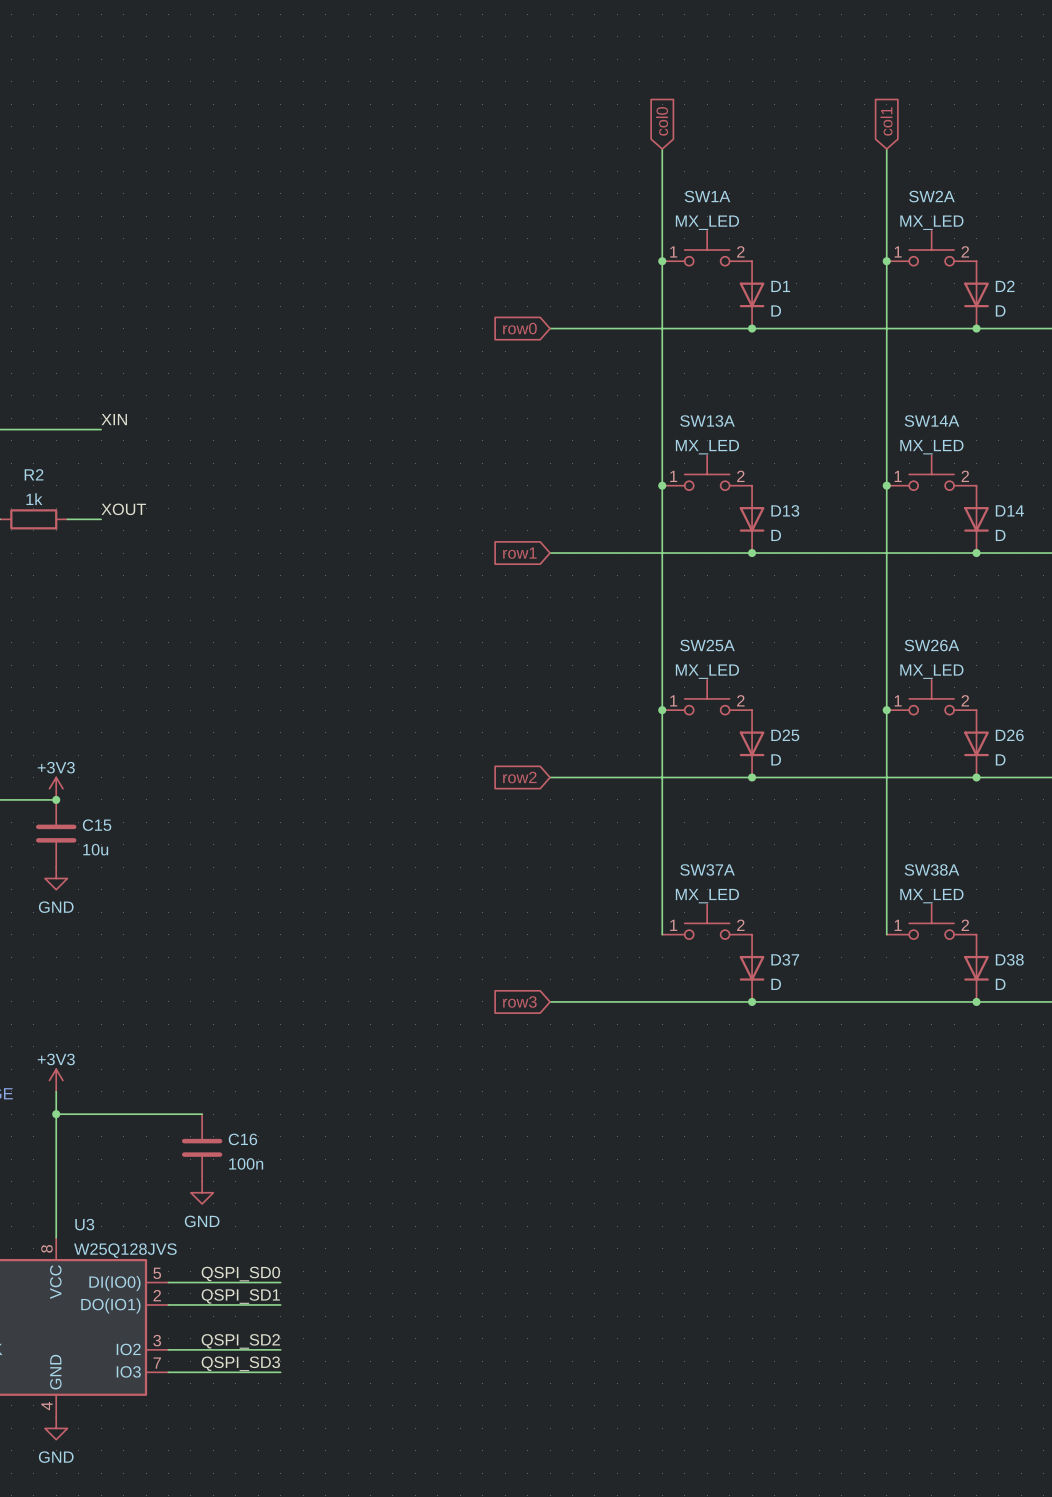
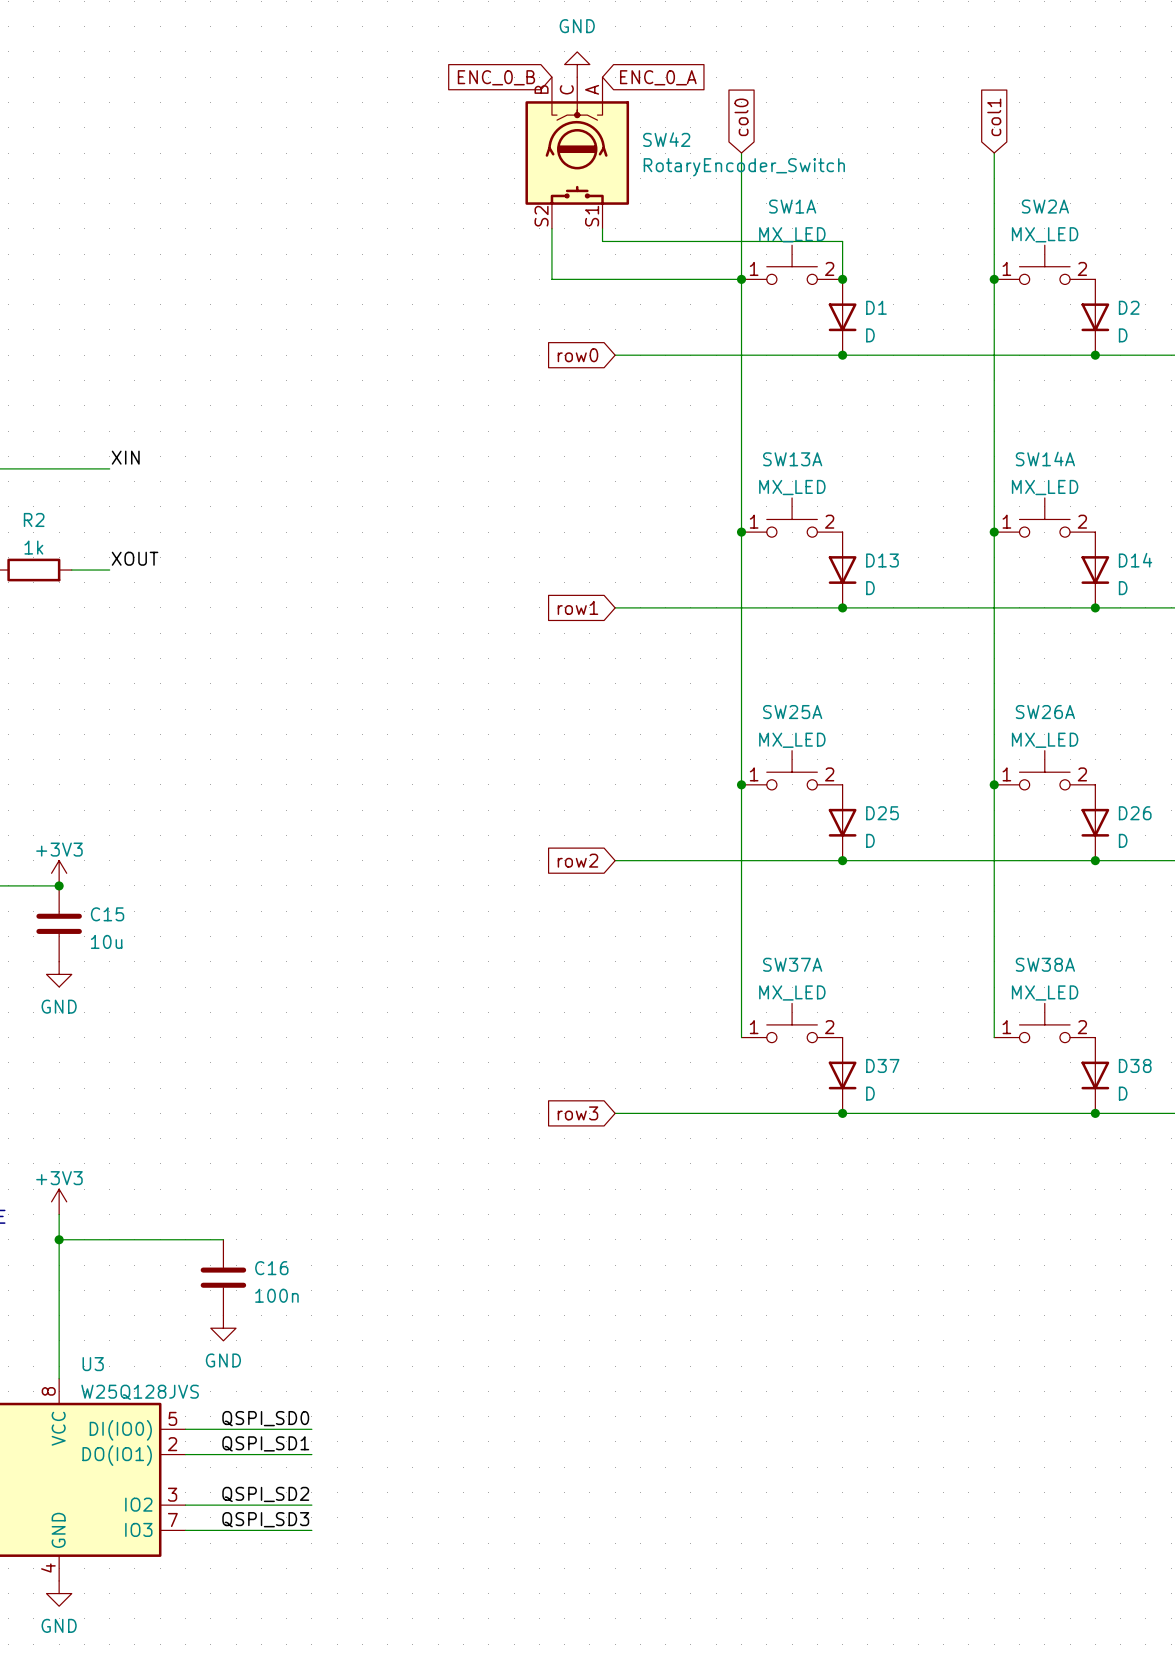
power symbol: none -> GND (577, 64)
global label: none -> ENC_0_B (496, 77)
global label: none -> ENC_0_A (658, 77)
SW42: none -> RotaryEncoder_Switch (577, 153)
wire: none -> (551, 228) (551, 279) (741, 279)
wire: none -> (602, 228) (602, 241) (842, 241) (842, 279)
junction: none -> (842, 279)

